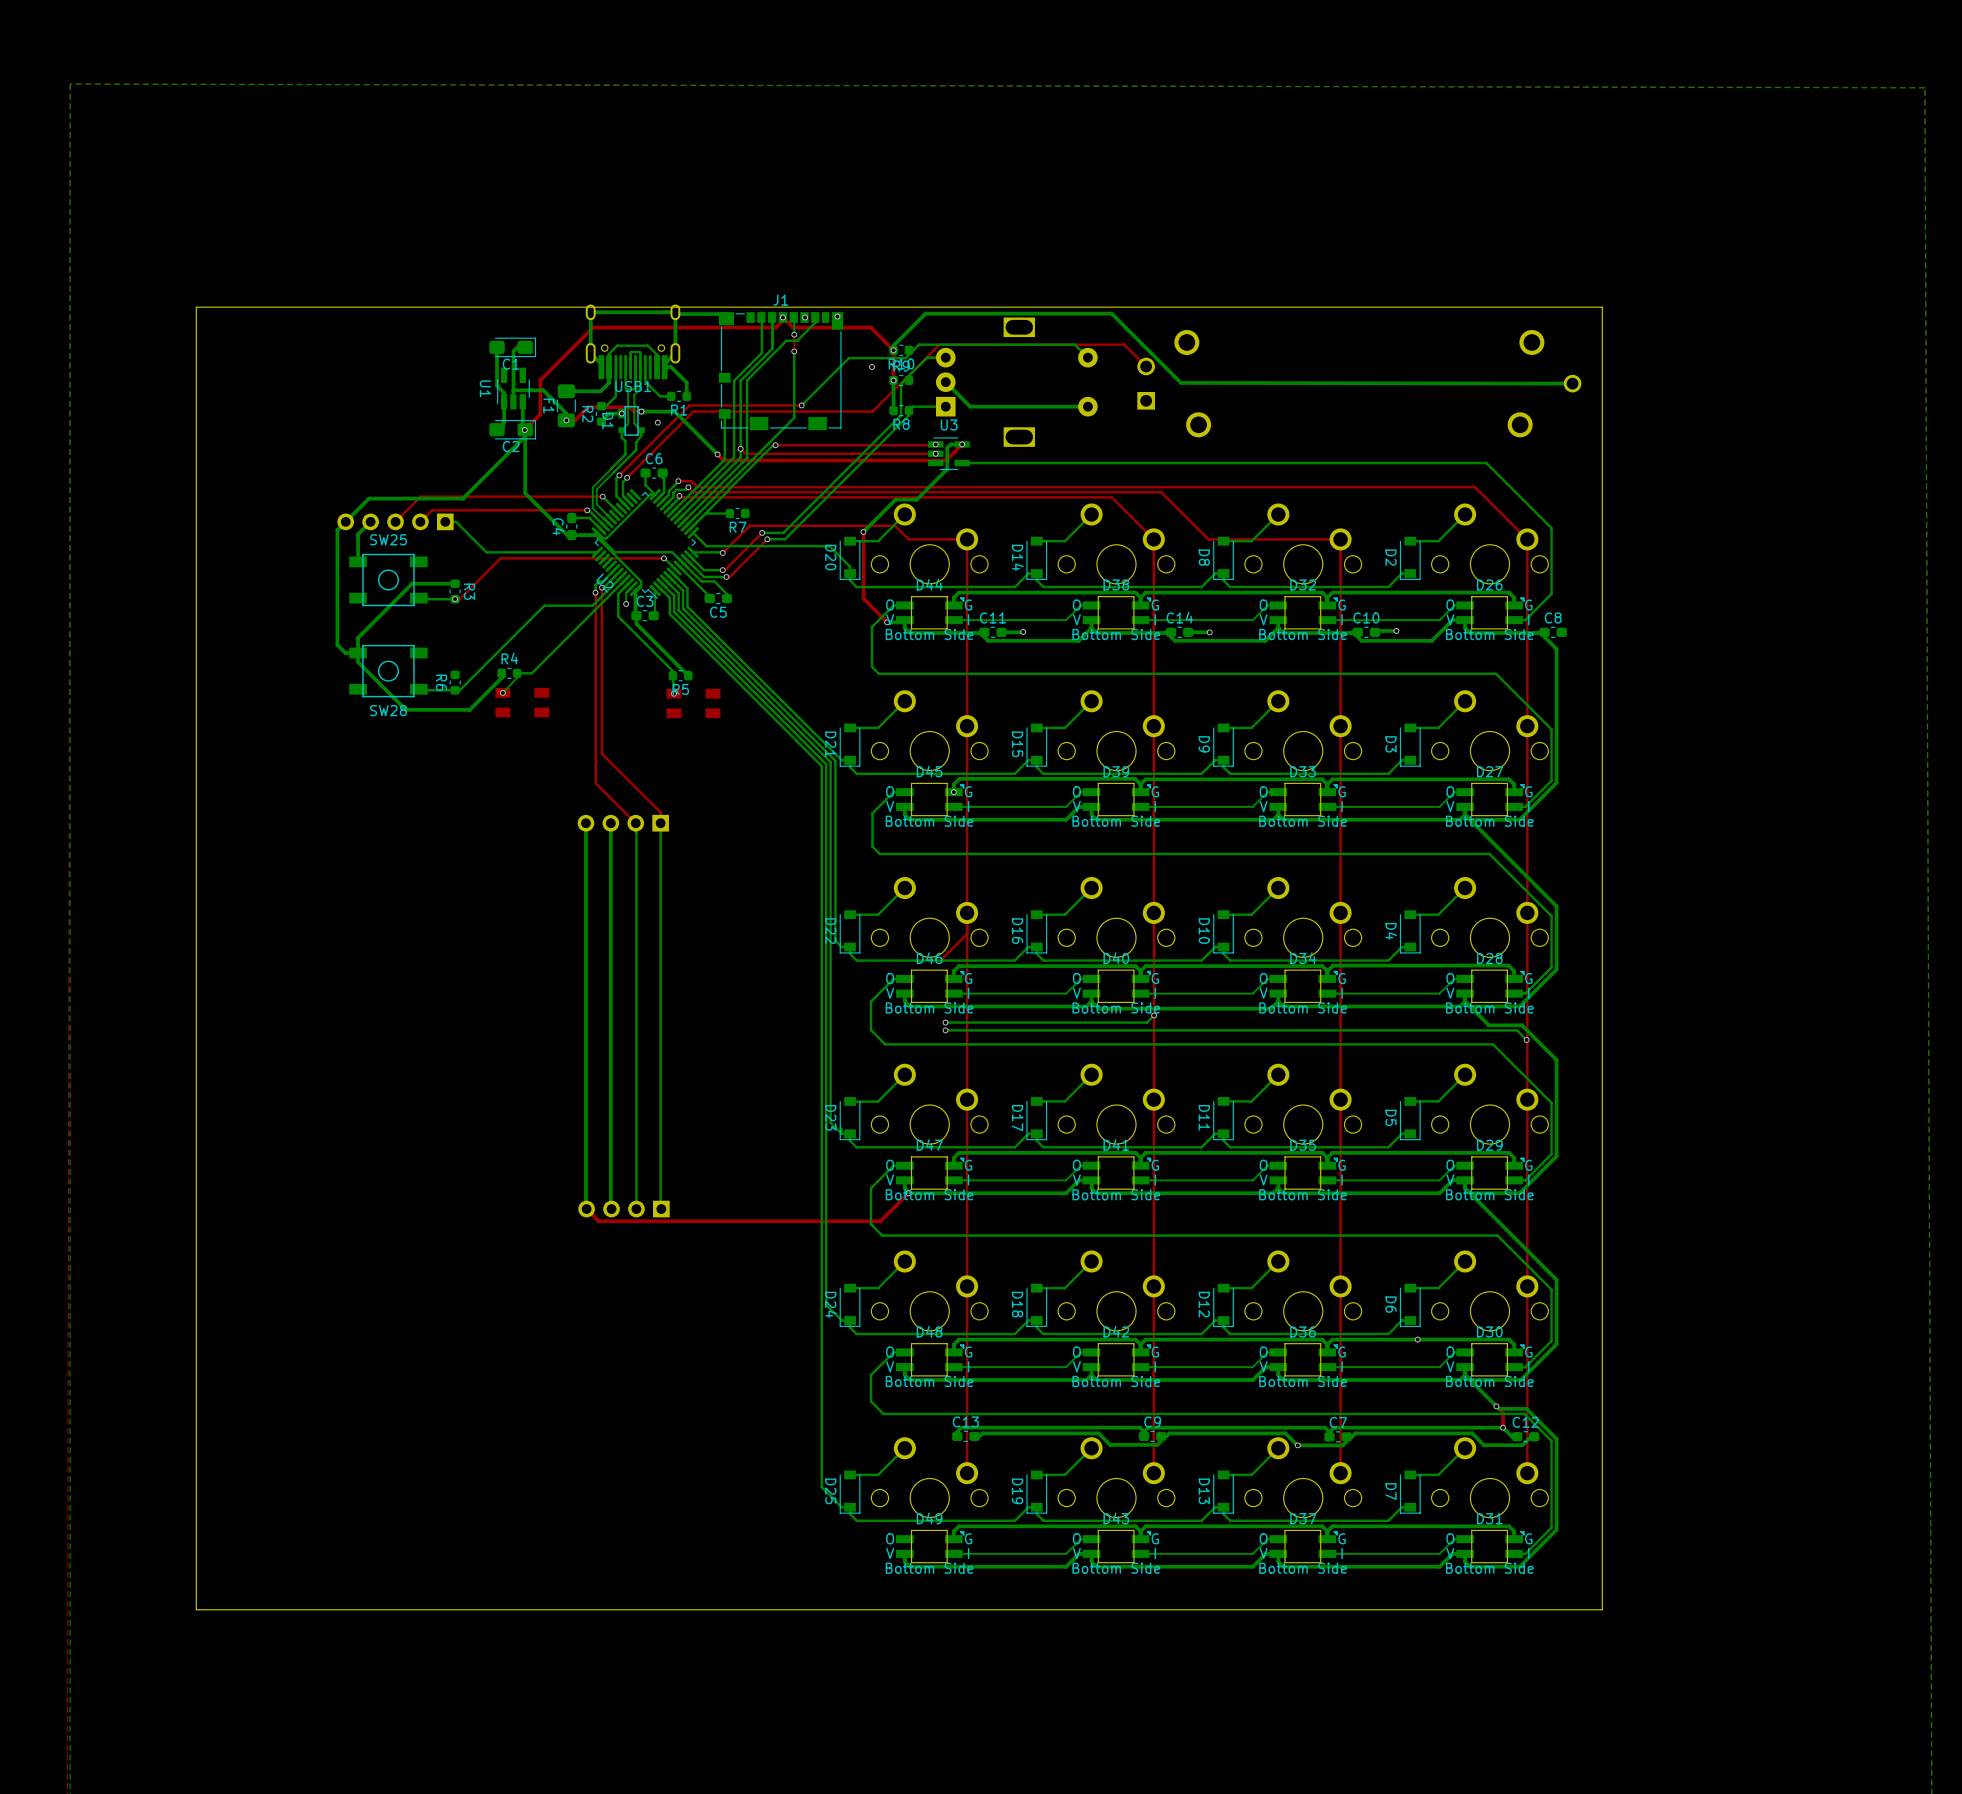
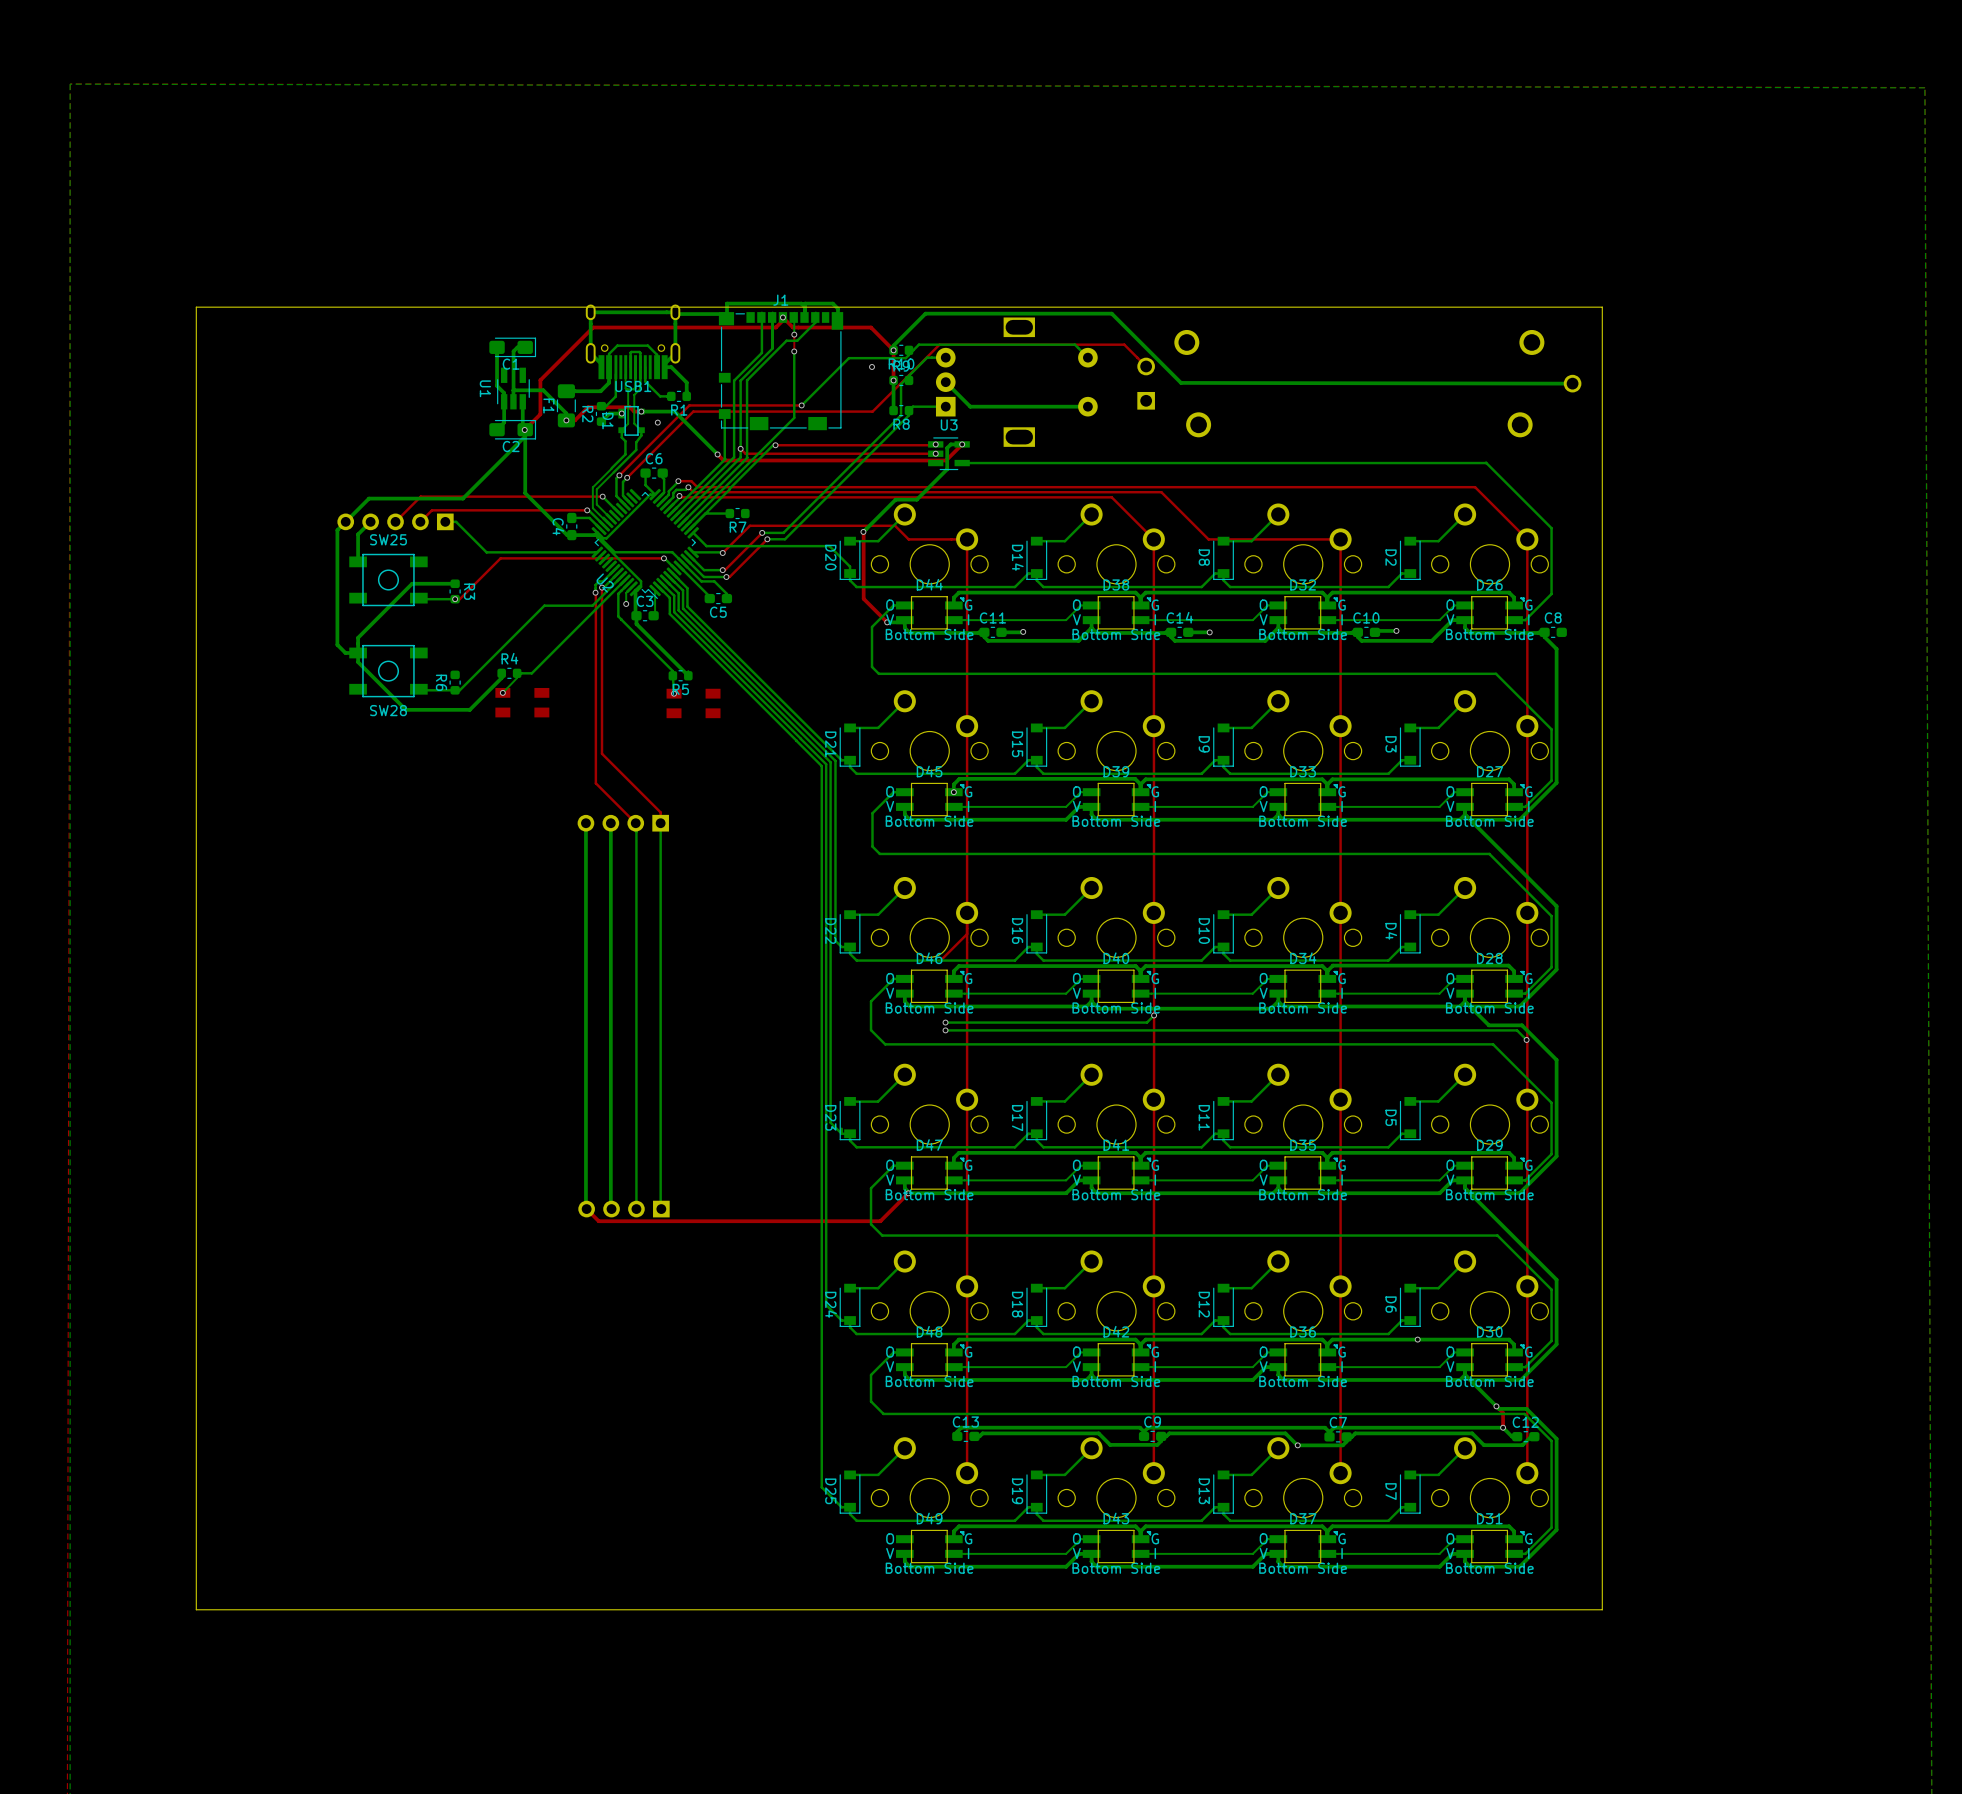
bottom track: none -> (727, 303) (801, 303) (805, 307)
bottom track: none -> (727, 303) (727, 314)
bottom track: none -> (805, 303) (832, 303) (837, 308) (837, 316)
via: (837, 316) -> none
via: (805, 317) -> none

